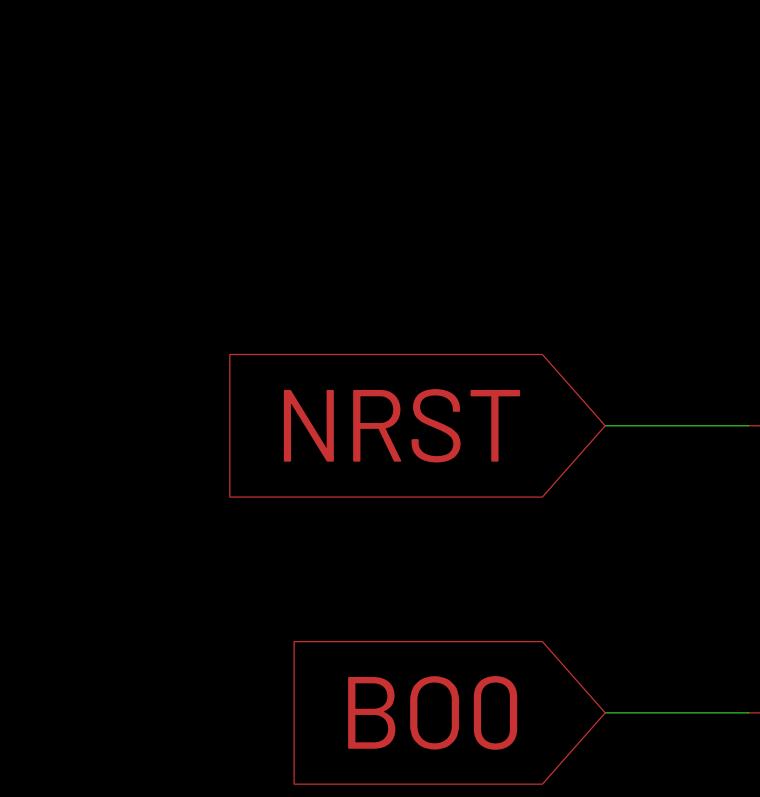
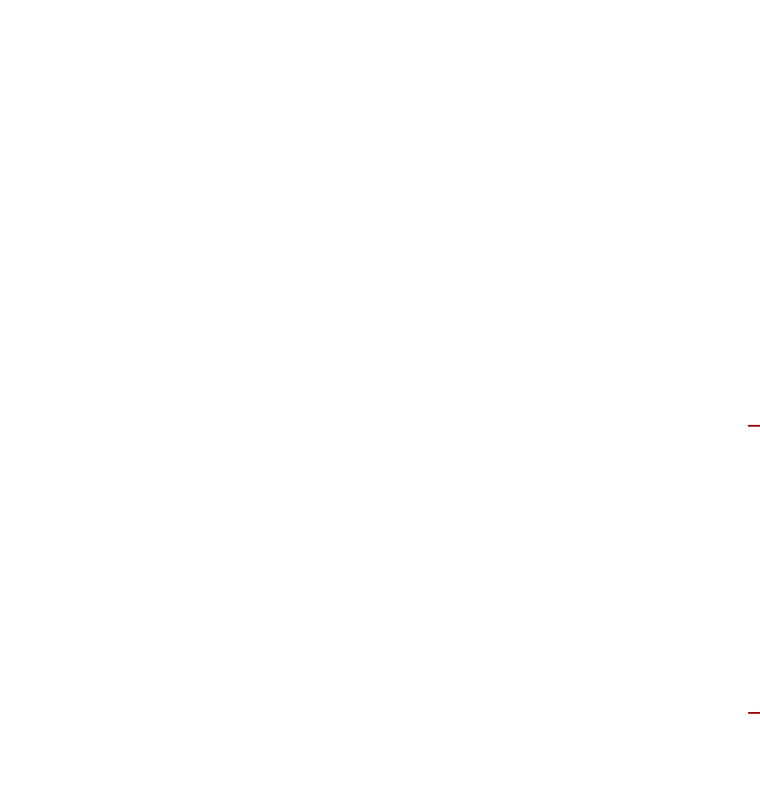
global label: NRST (401, 425) -> none
wire: (605, 425) (748, 425) -> none
global label: BO0 (432, 712) -> none
wire: (605, 712) (748, 712) -> none

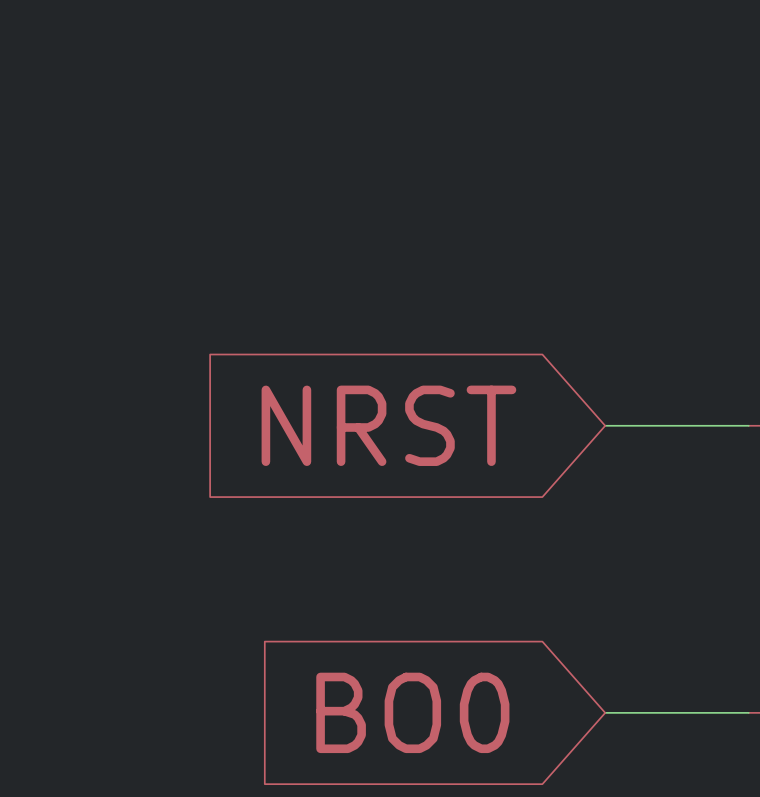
global label: none -> NRST (388, 425)
wire: none -> (605, 425) (748, 425)
global label: none -> BO0 (412, 712)
wire: none -> (605, 712) (748, 712)

